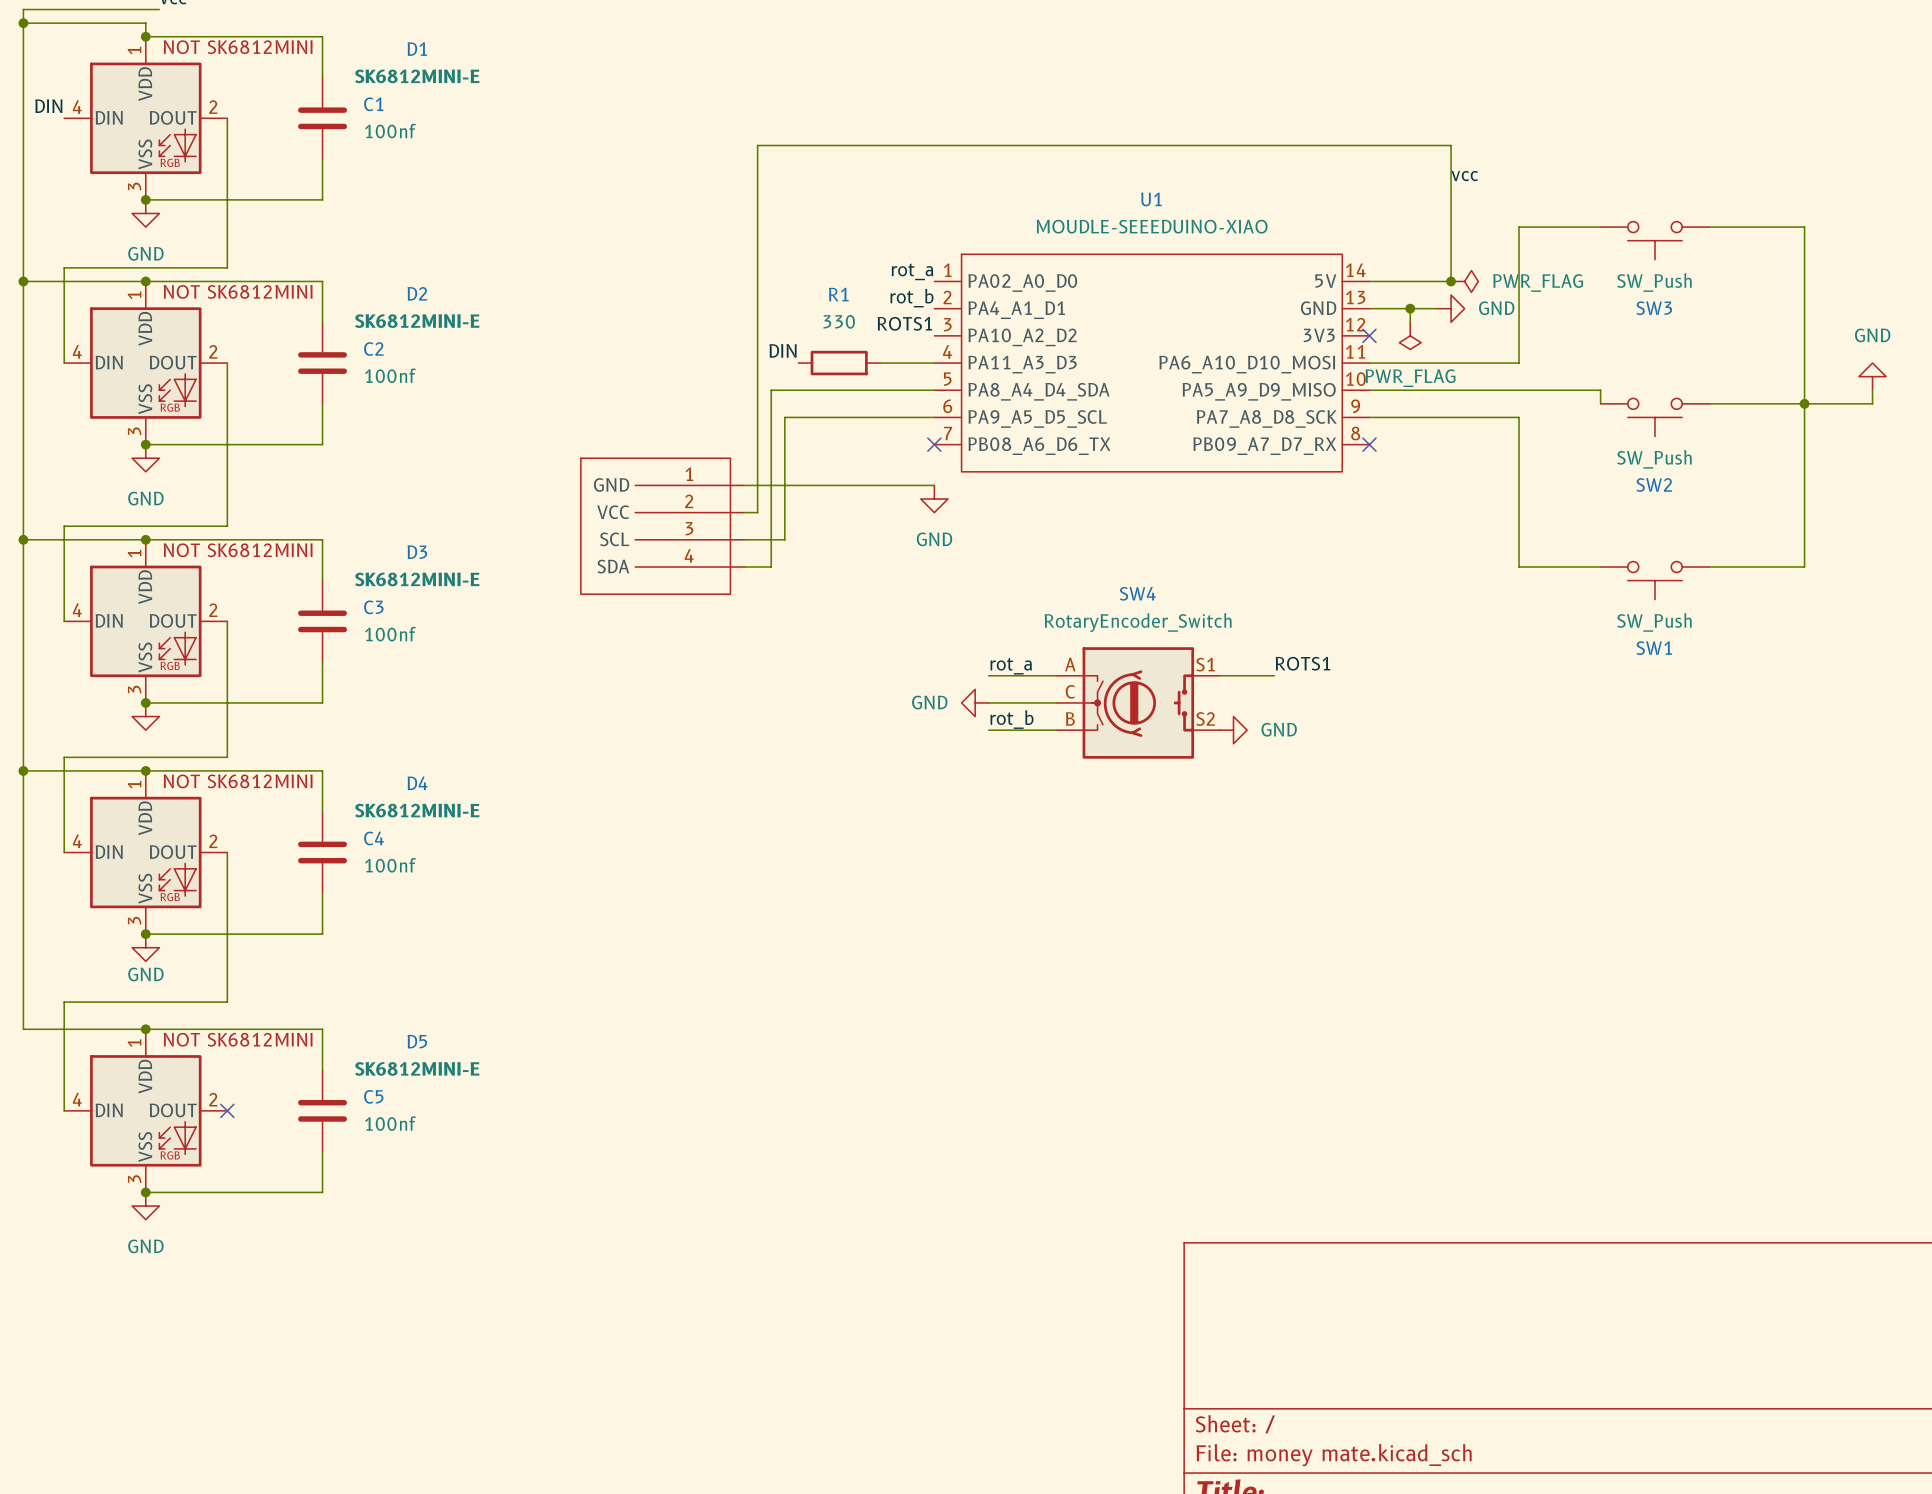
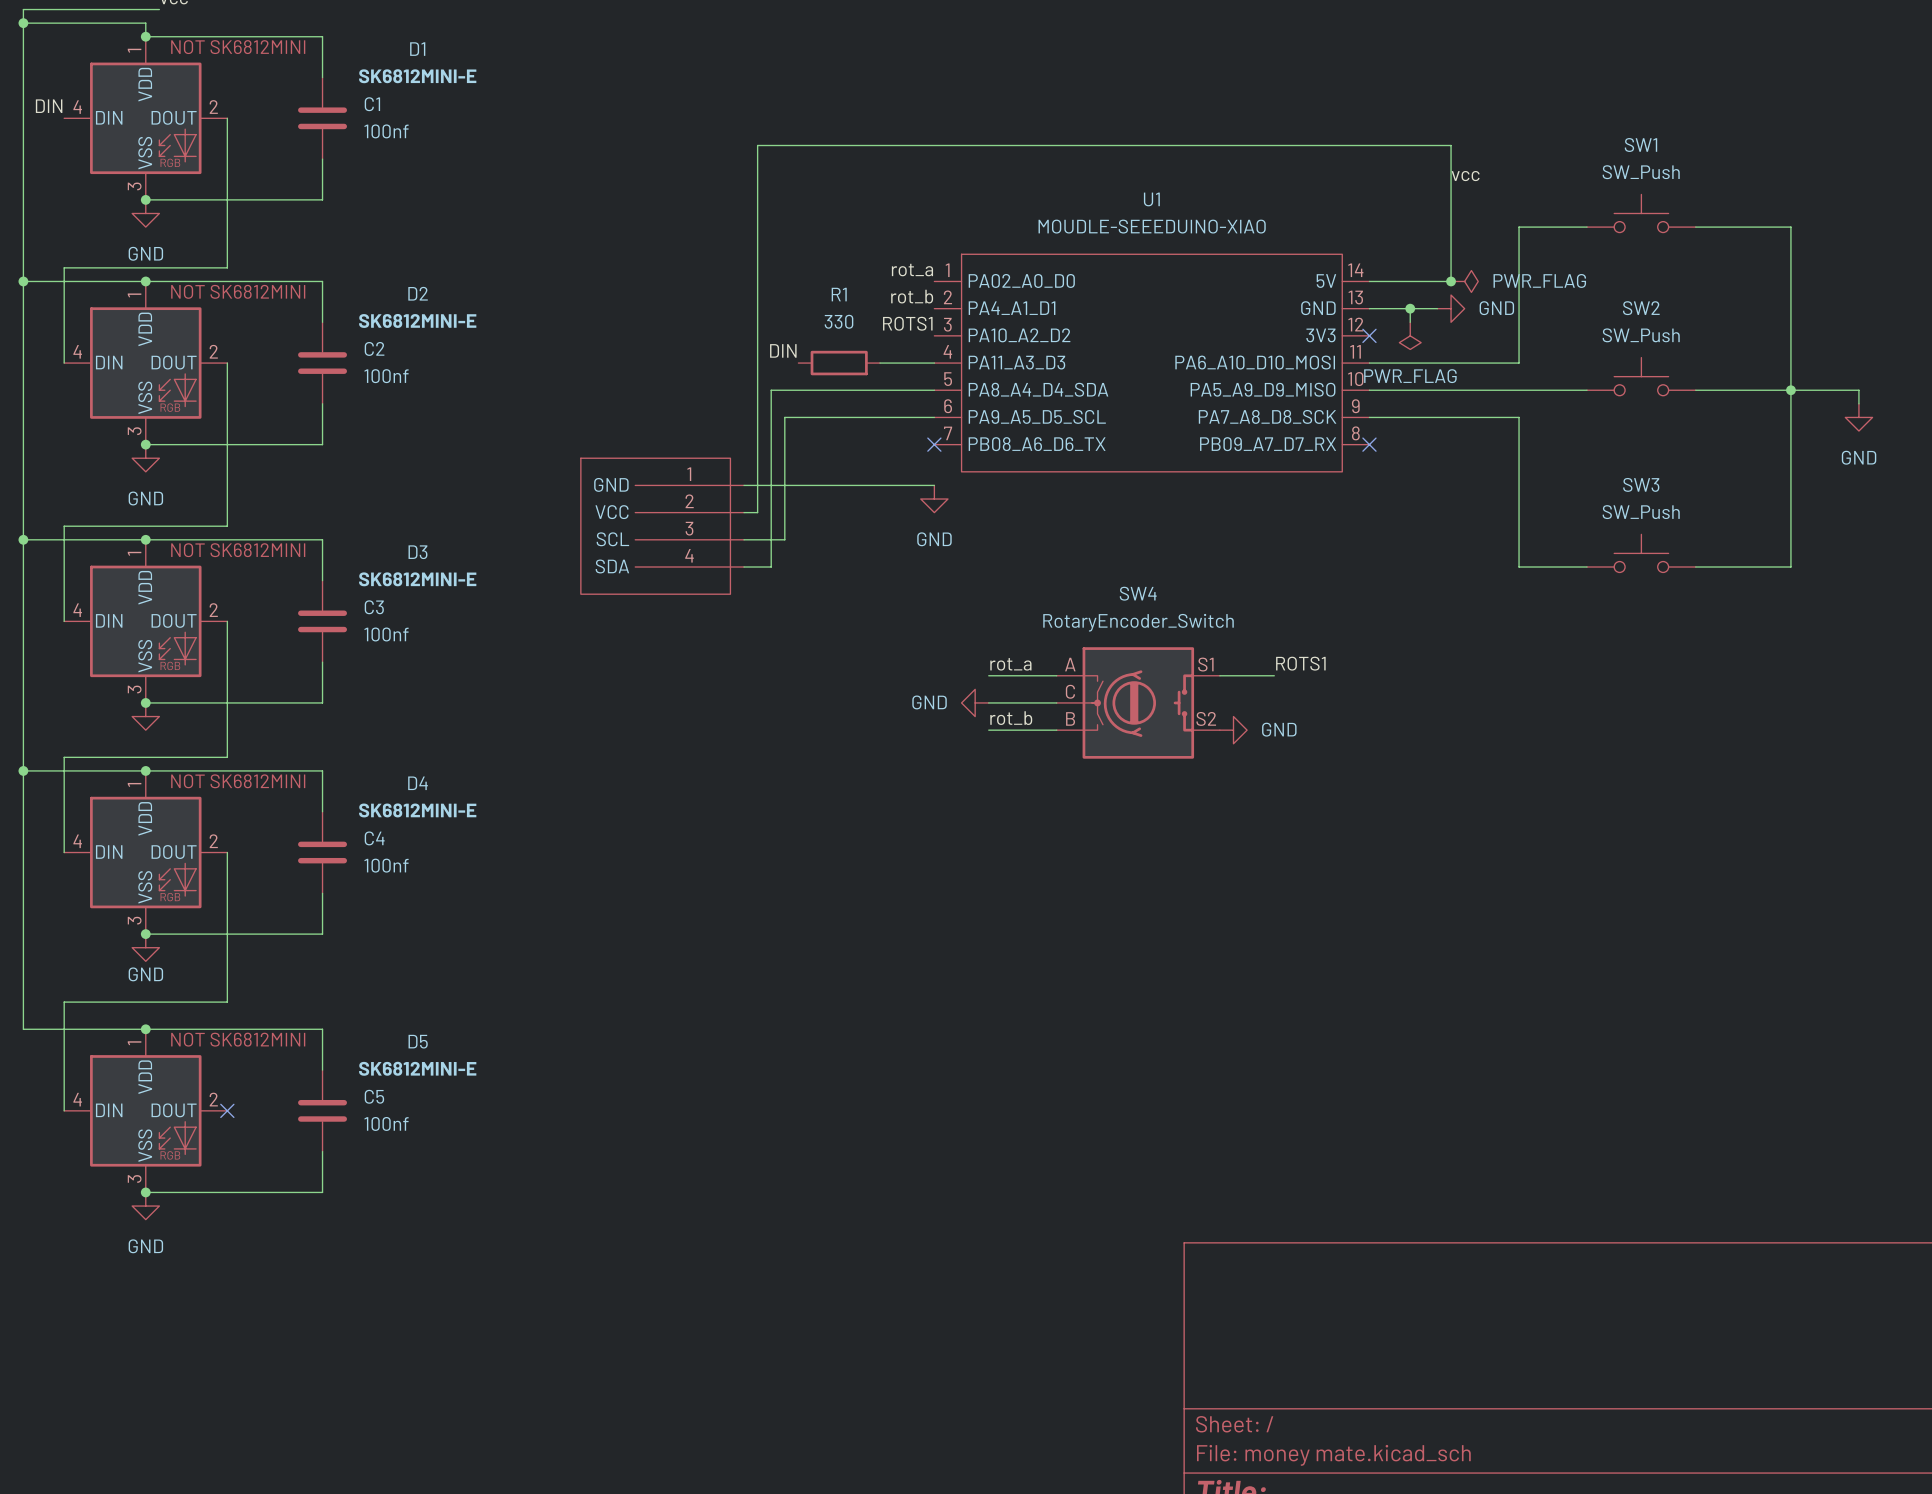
wire: (1790, 227) (1804, 227) (1804, 567) (1790, 567) -> (1790, 227) (1790, 567)
SW3 rotation: 0° (1654, 240) -> 180° (1641, 553)
SW3 position: (1654, 240) -> (1641, 553)
power symbol rotation: 0° (1872, 376) -> 180° (1858, 417)
power symbol position: GND (1872, 376) -> GND (1858, 417)
wire: (1587, 390) (1600, 390) (1600, 403) -> none
wire: none -> (1695, 390) (1858, 390) (1858, 403)
wire: (1872, 390) (1872, 403) (1709, 403) -> none
junction position: (1804, 403) -> (1790, 390)
SW2 rotation: 0° (1654, 417) -> 180° (1641, 376)
SW1 rotation: 0° (1654, 580) -> 180° (1641, 213)
SW1 position: (1654, 580) -> (1641, 213)

